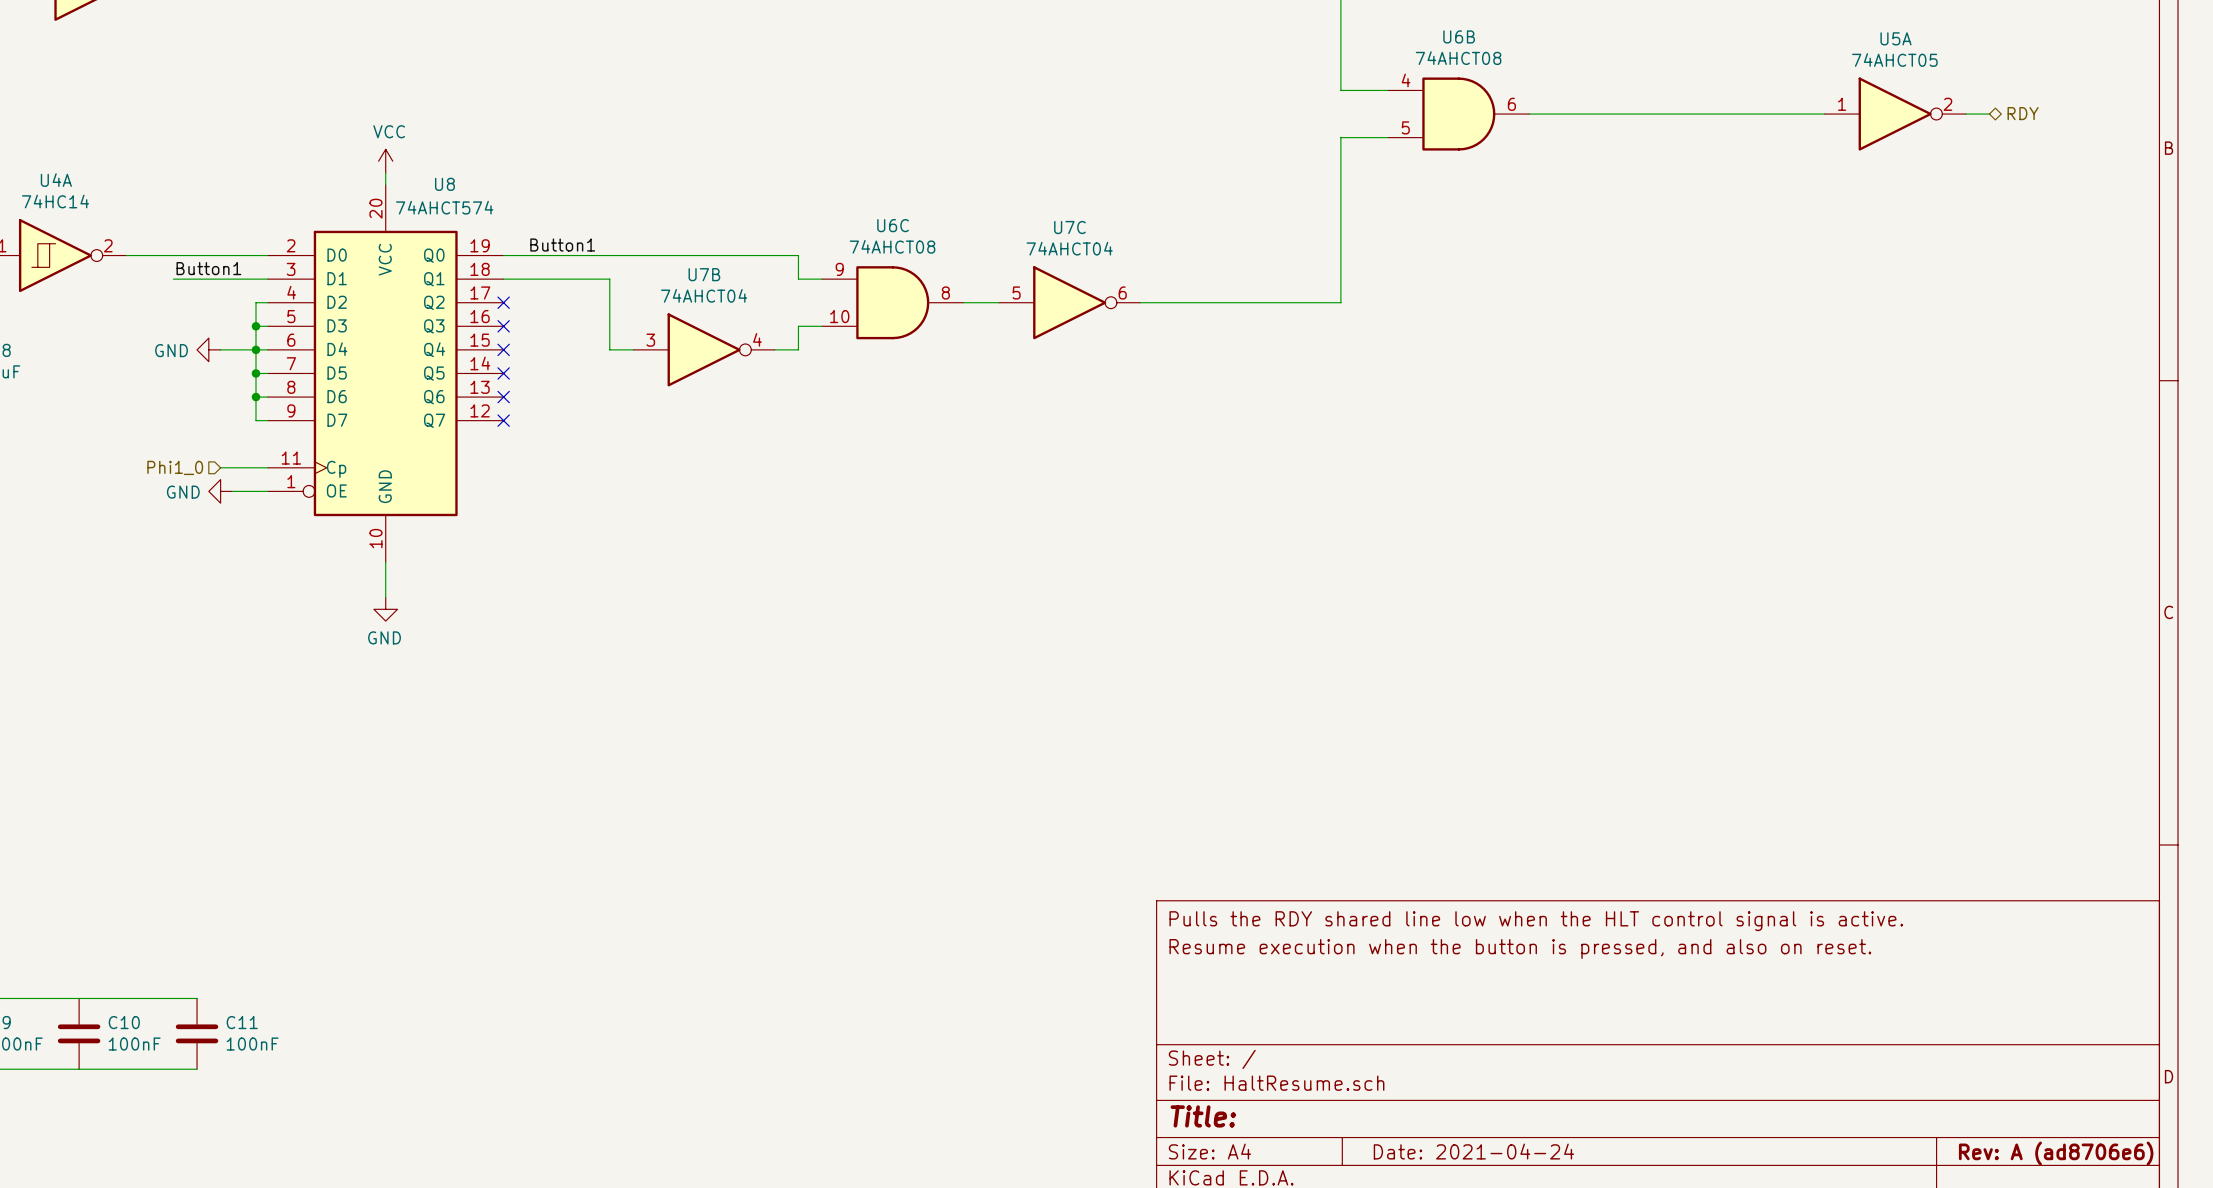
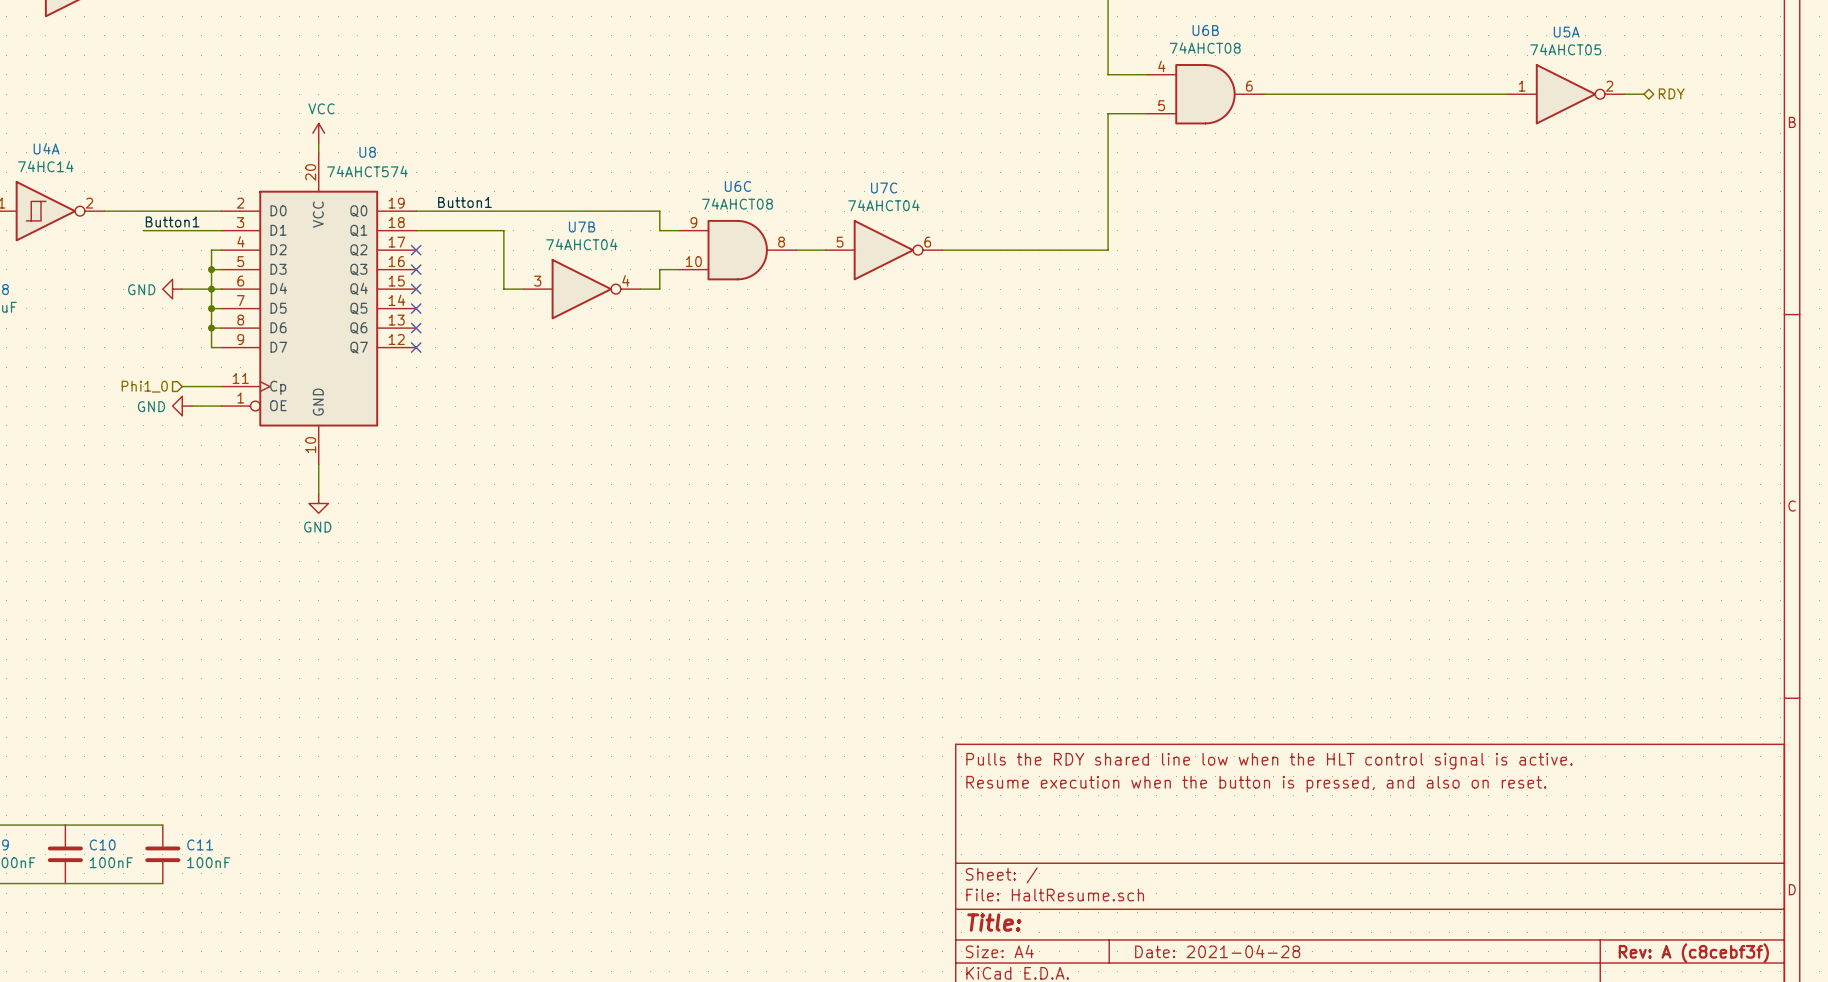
title block: Date: 2021-04-24 (1473, 1151) -> Date: 2021-04-28 (1217, 951)
title block: Rev: A (ad8706e6) (2056, 1153) -> Rev: A (c8cebf3f) (1693, 953)

